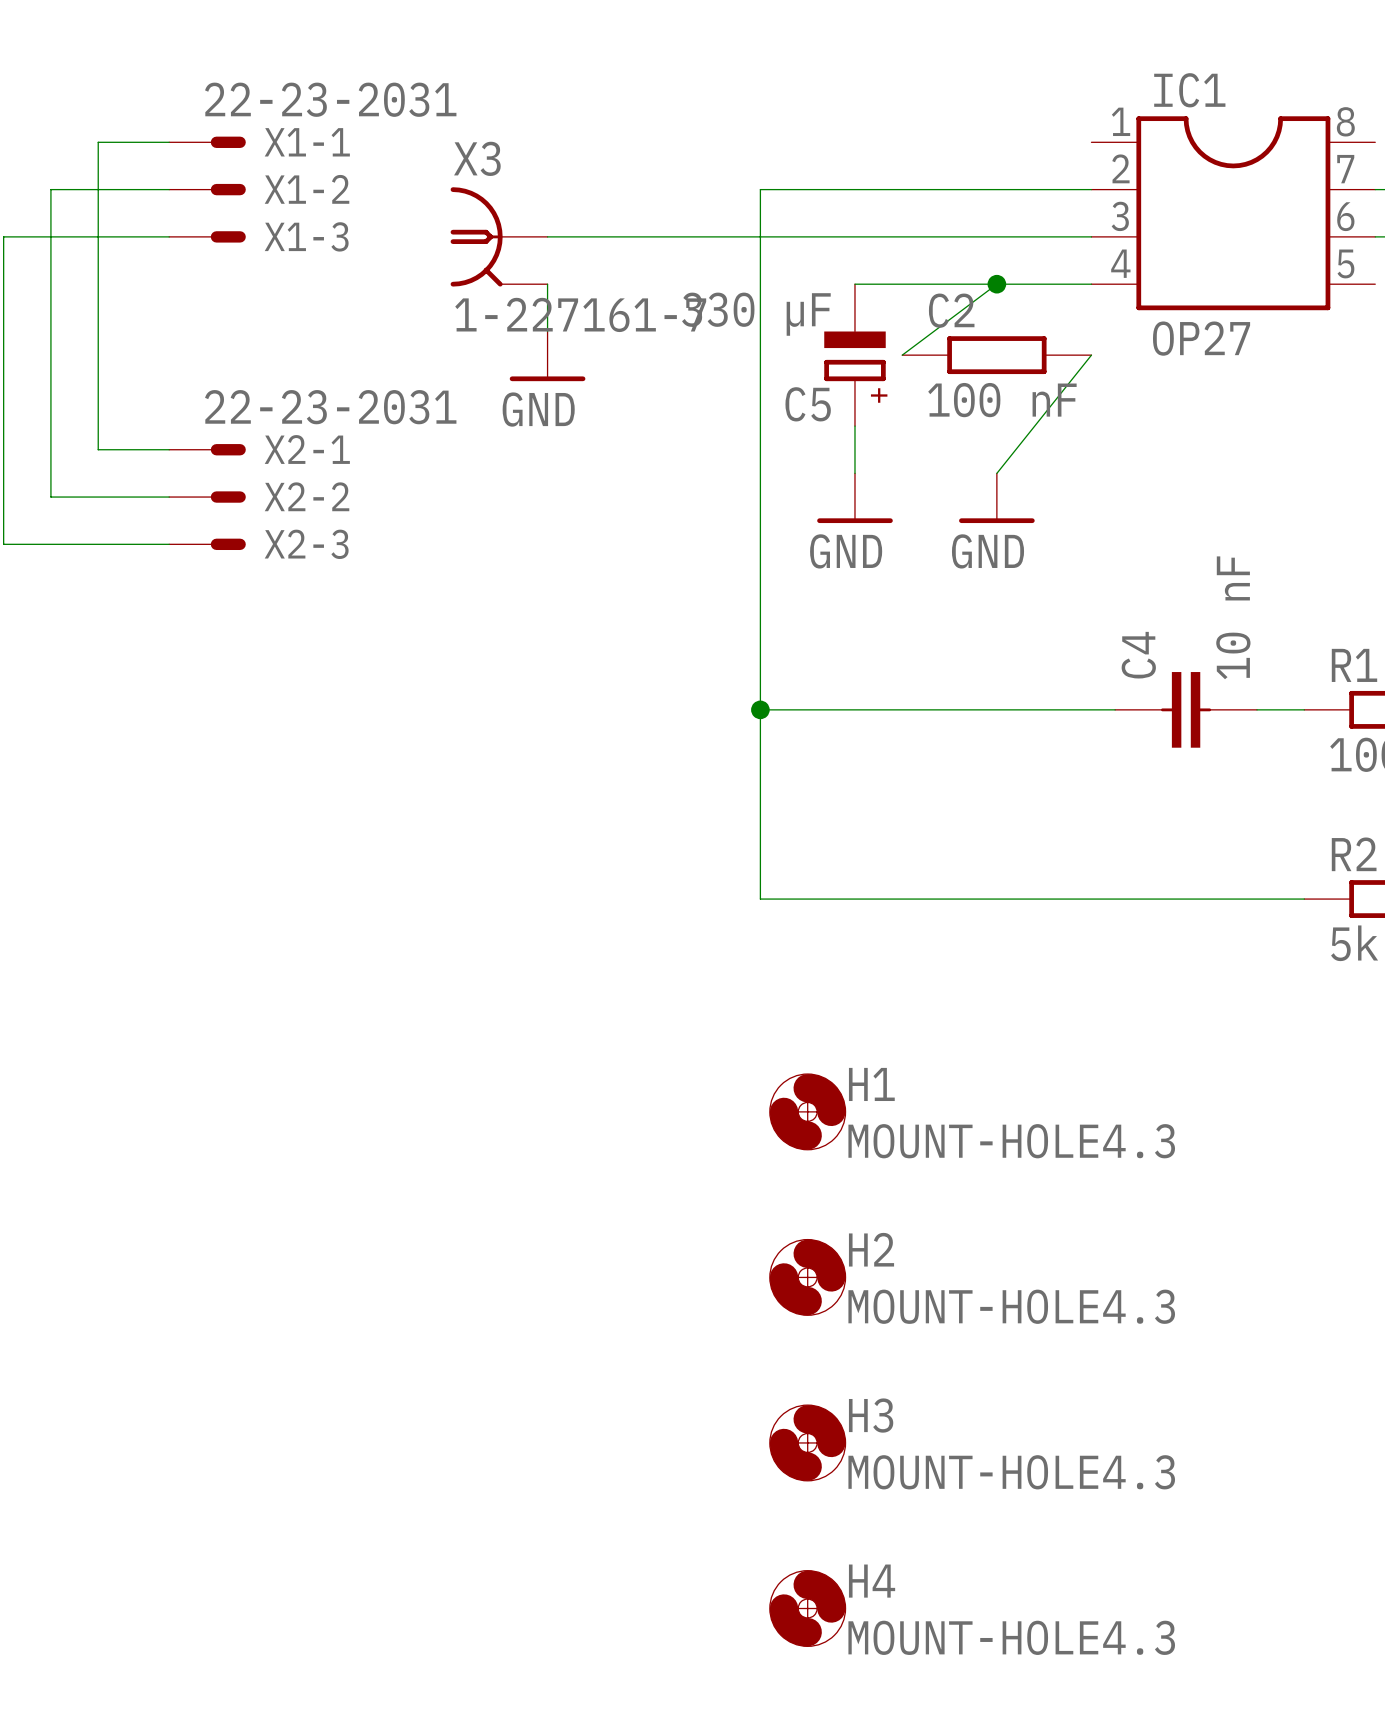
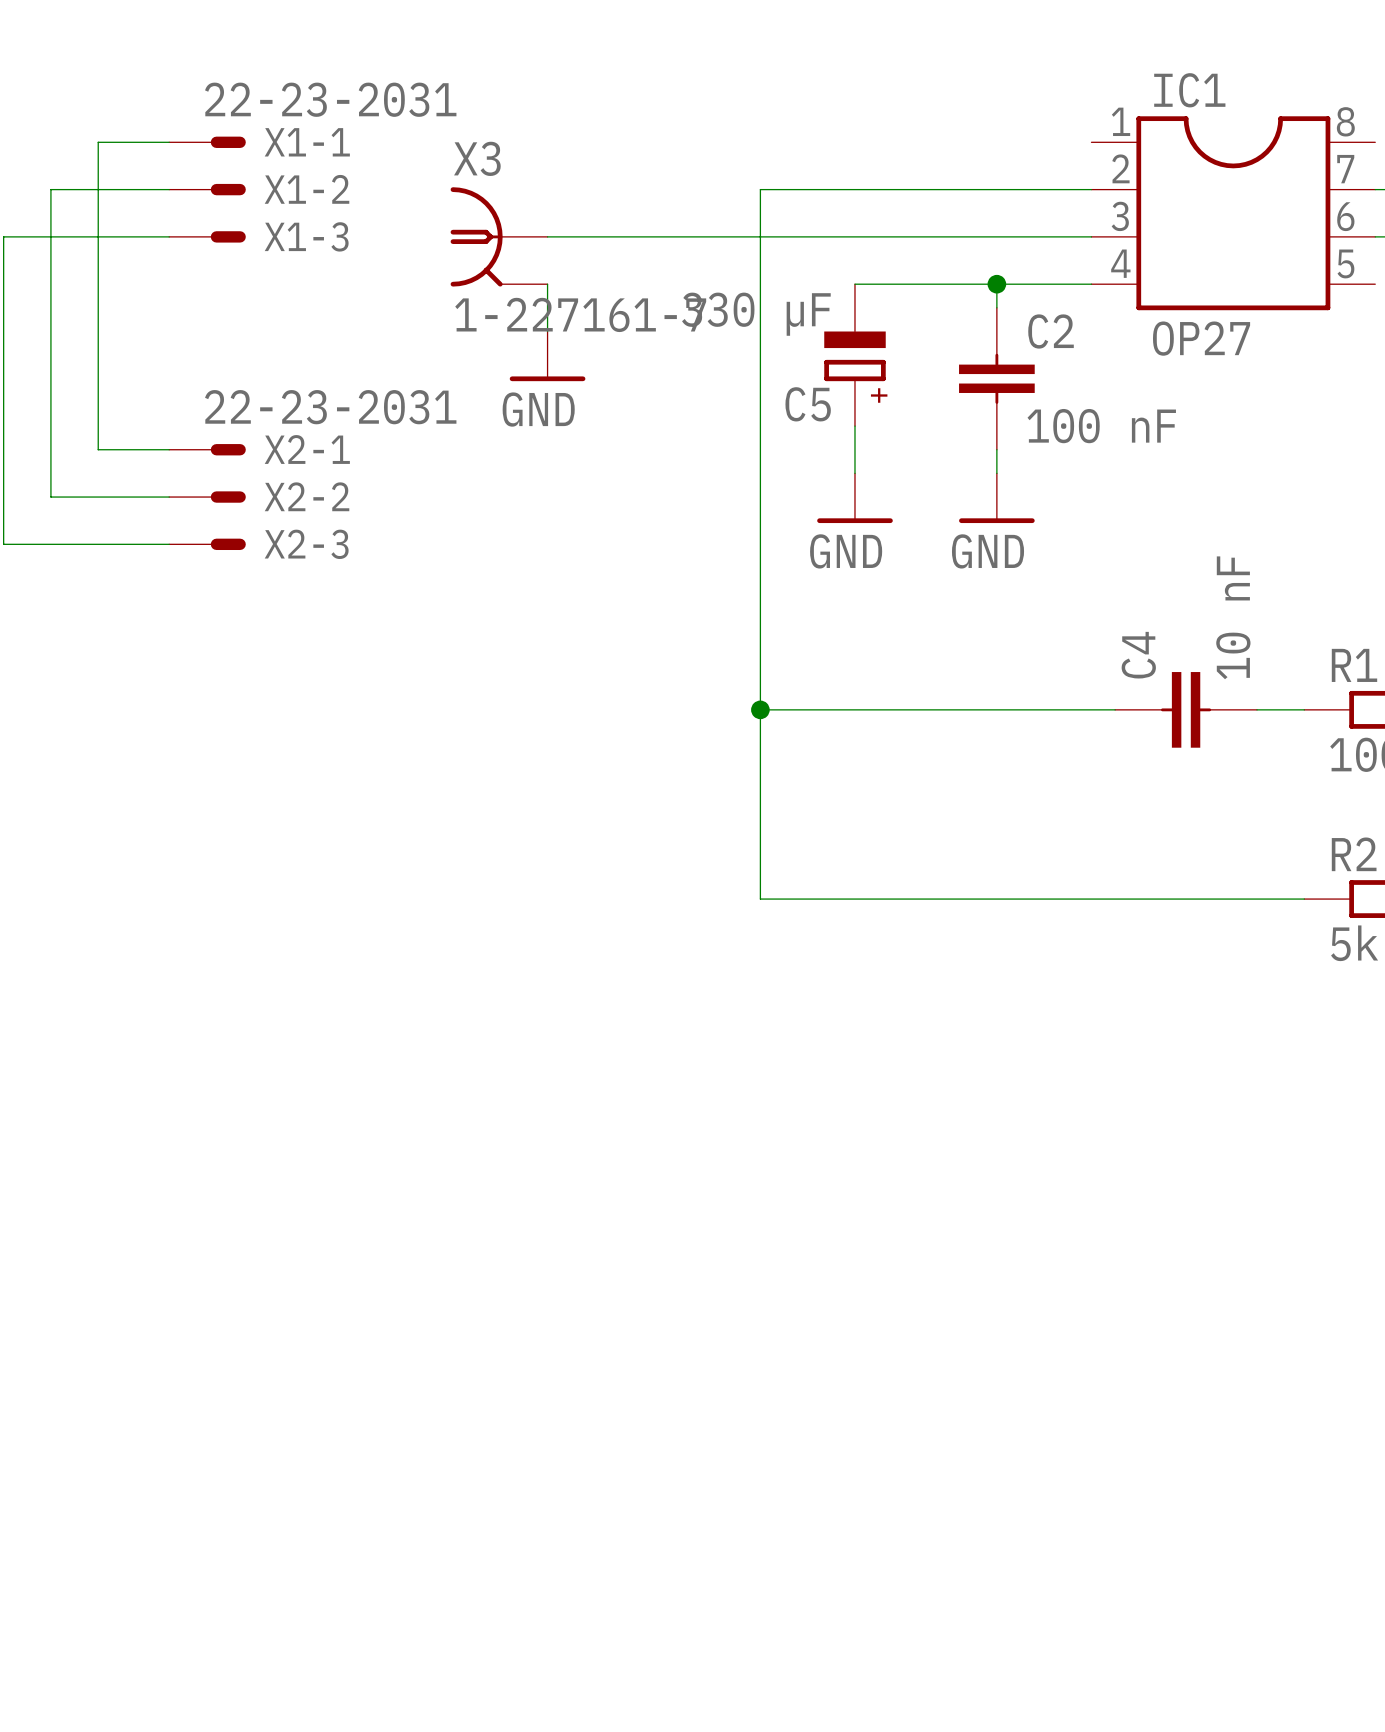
wire: (996, 284) (902, 355) -> (996, 284) (996, 307)
C2 name position: C2 (951, 310) -> C2 (1051, 331)
C2 symbol: [902, 336, 1092, 375] -> [959, 307, 1035, 450]
wire: (1091, 355) (996, 473) -> (996, 449) (996, 473)
C2 value position: 100 nF (1002, 400) -> 100 nF (1101, 426)
H1: MOUNT-HOLE4.3 (807, 1111) -> none
H2: MOUNT-HOLE4.3 (807, 1277) -> none
H3: MOUNT-HOLE4.3 (807, 1442) -> none
H4: MOUNT-HOLE4.3 (807, 1608) -> none

